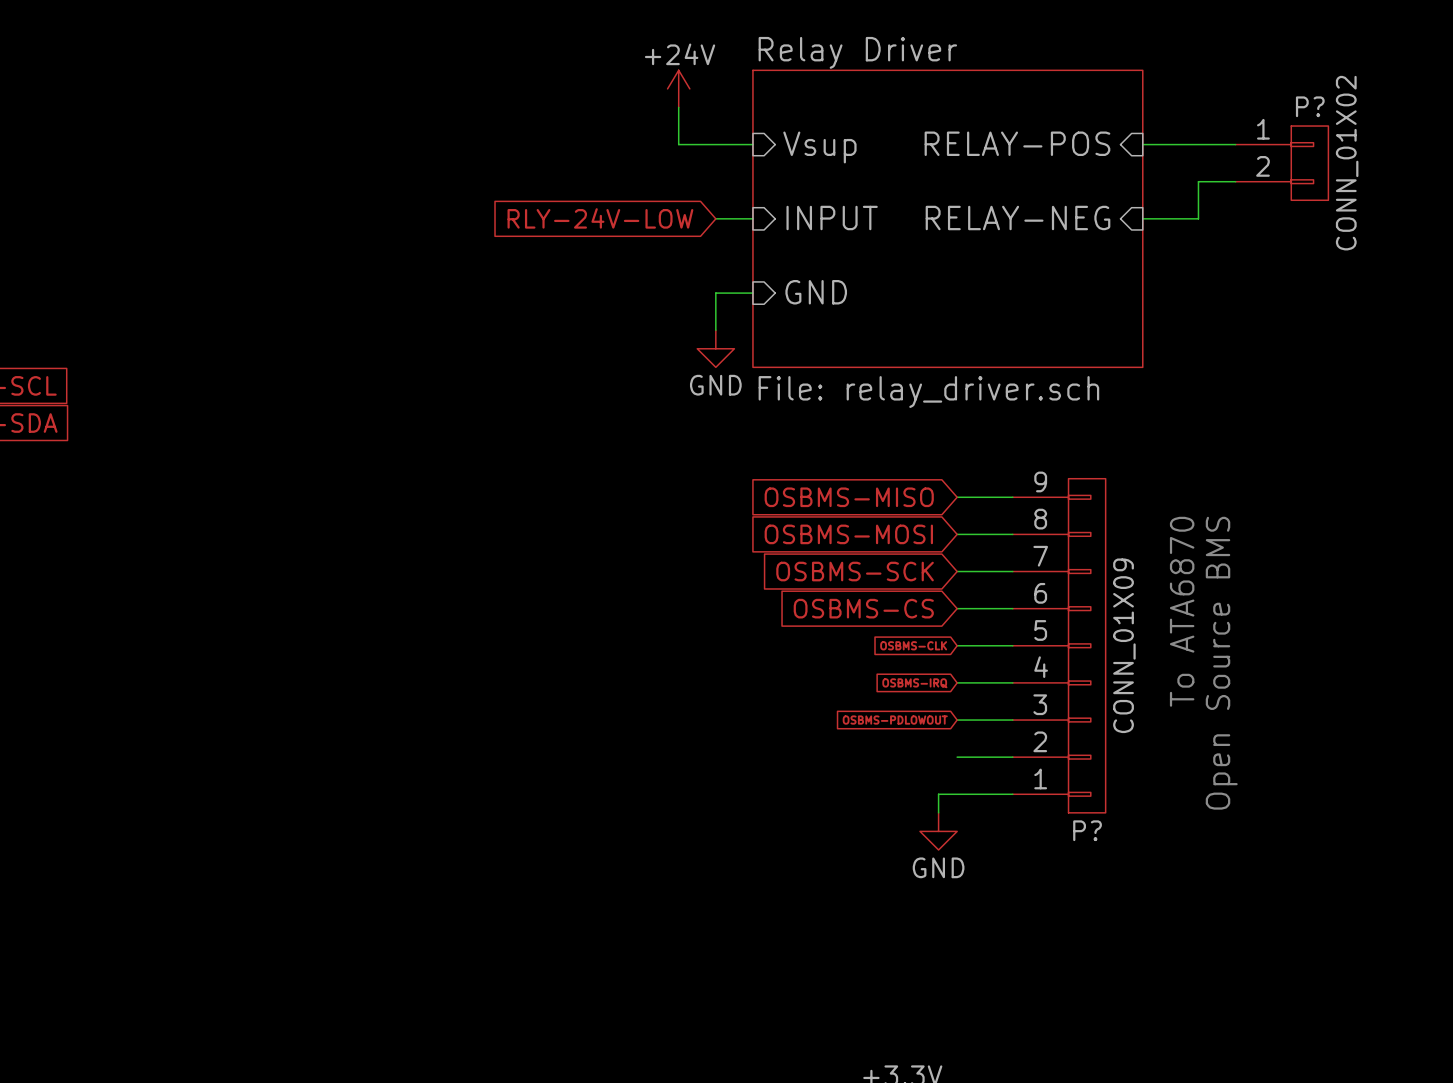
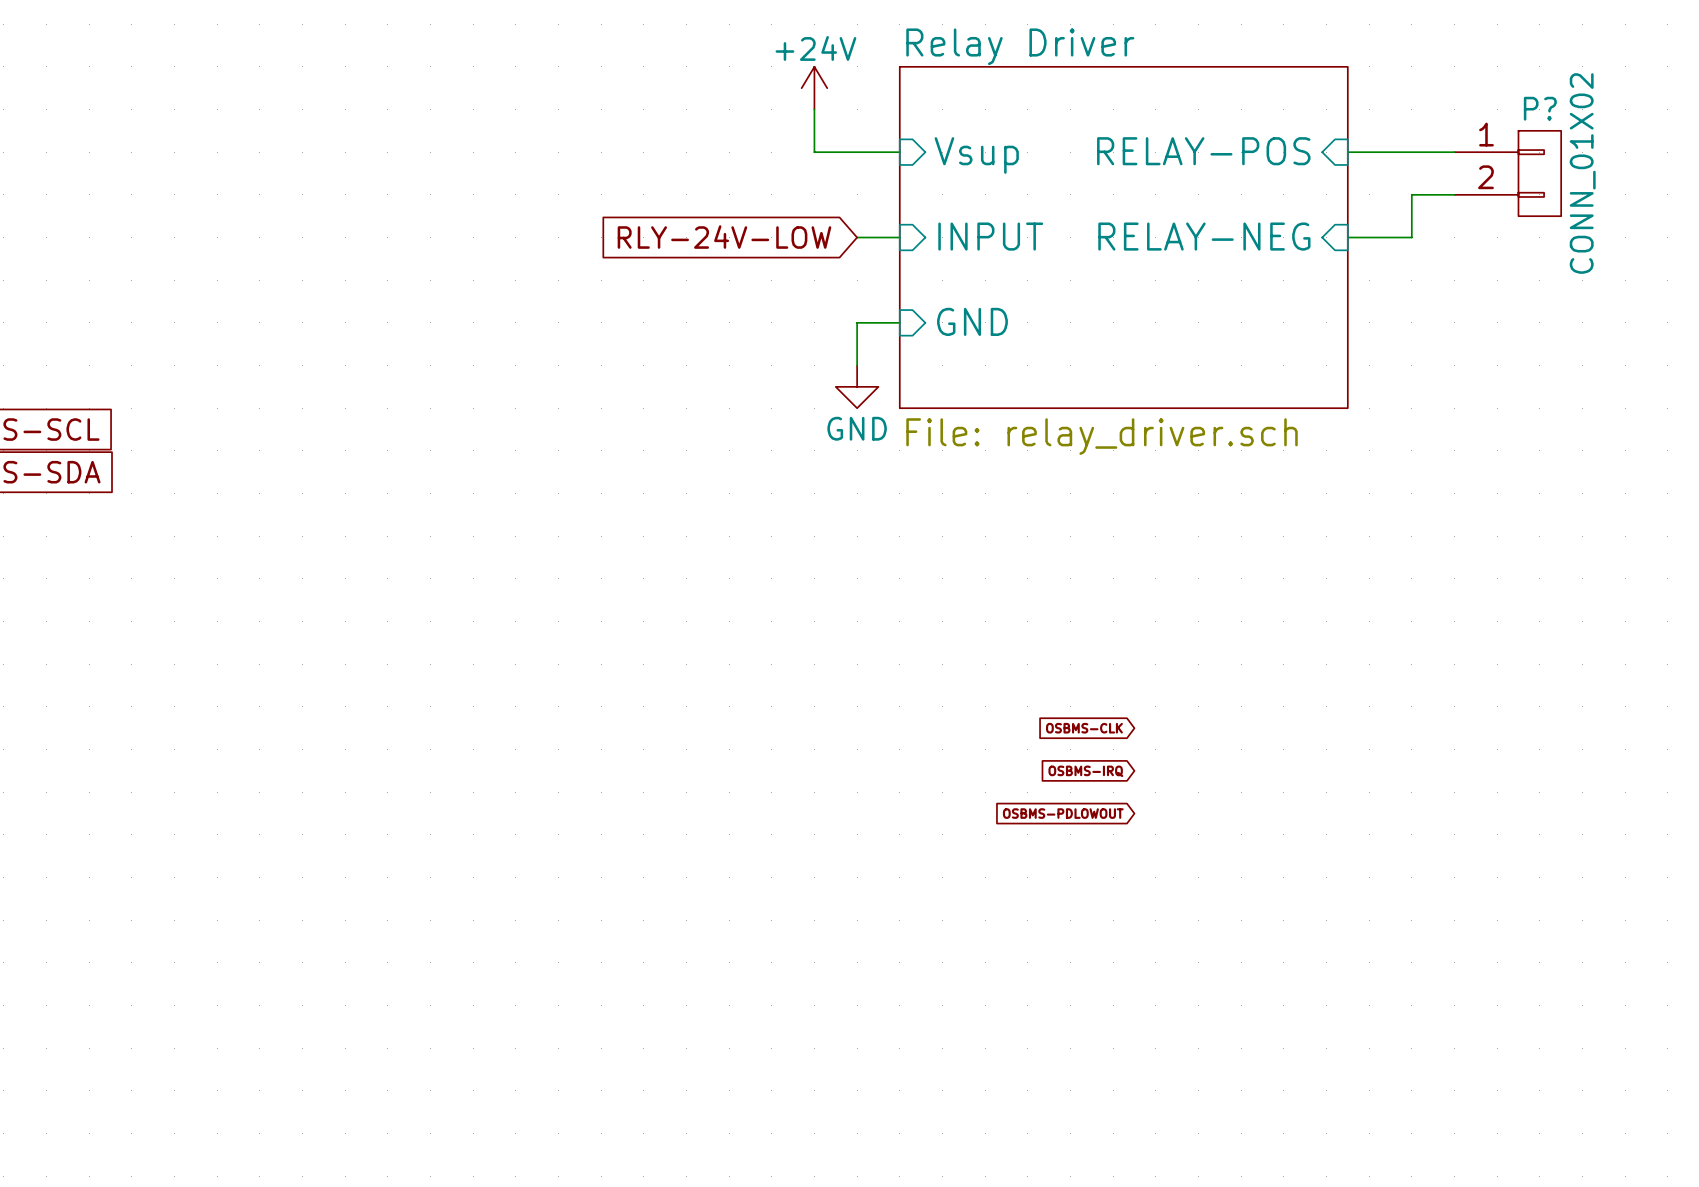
global label: OSBMS-MISO (849, 497) -> none
wire: (957, 497) (1012, 497) -> none
global label: OSBMS-MOSI (848, 534) -> none
wire: (957, 534) (1012, 534) -> none
global label: OSBMS-SCK (855, 571) -> none
wire: (957, 571) (1012, 571) -> none
global label: OSBMS-CS (863, 608) -> none
wire: (957, 608) (1012, 608) -> none
text: To ATA6870 (1182, 611) -> none
wire: (957, 645) (1012, 645) -> none
P?: CONN_01X09 (1059, 645) -> none
text: Open Source BMS (1221, 663) -> none
wire: (957, 682) (1012, 682) -> none
wire: (957, 720) (1012, 720) -> none
wire: (957, 757) (1012, 757) -> none
wire: (1012, 794) (938, 794) (938, 812) -> none
power symbol: GND (938, 831) -> none

